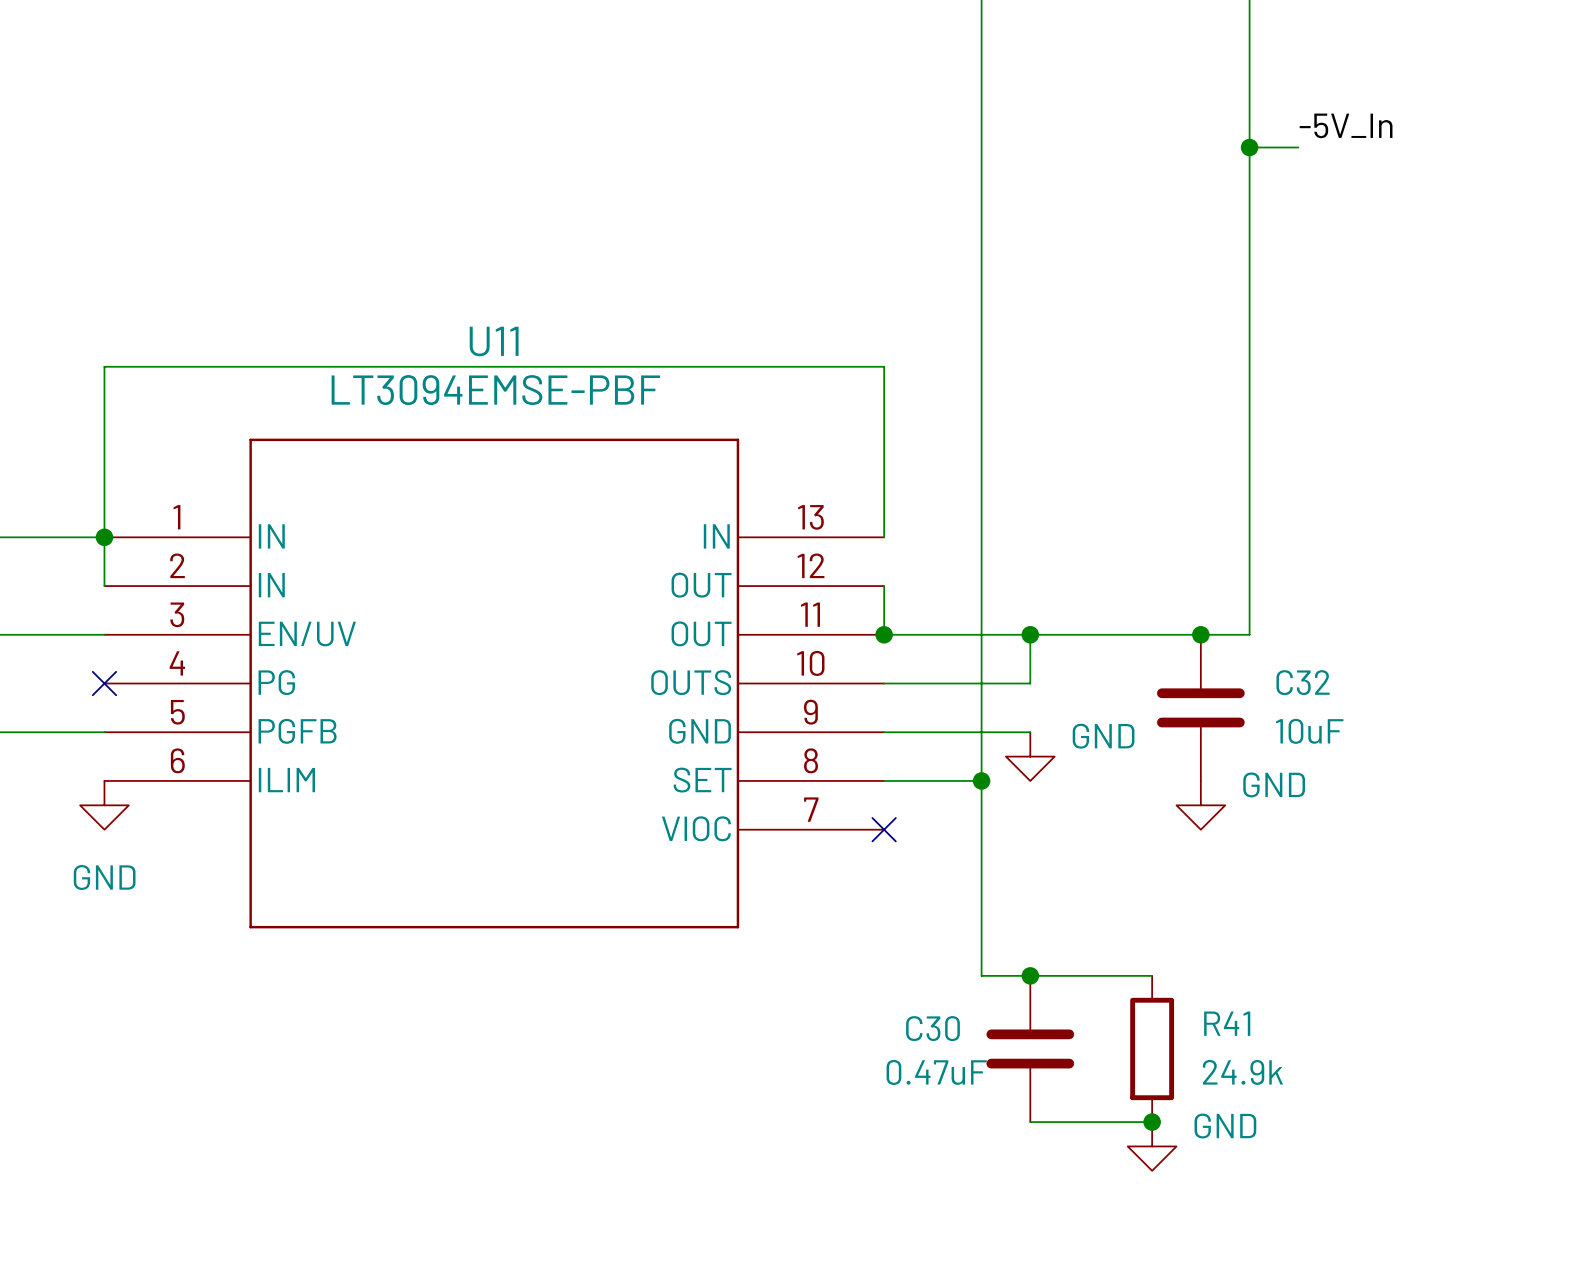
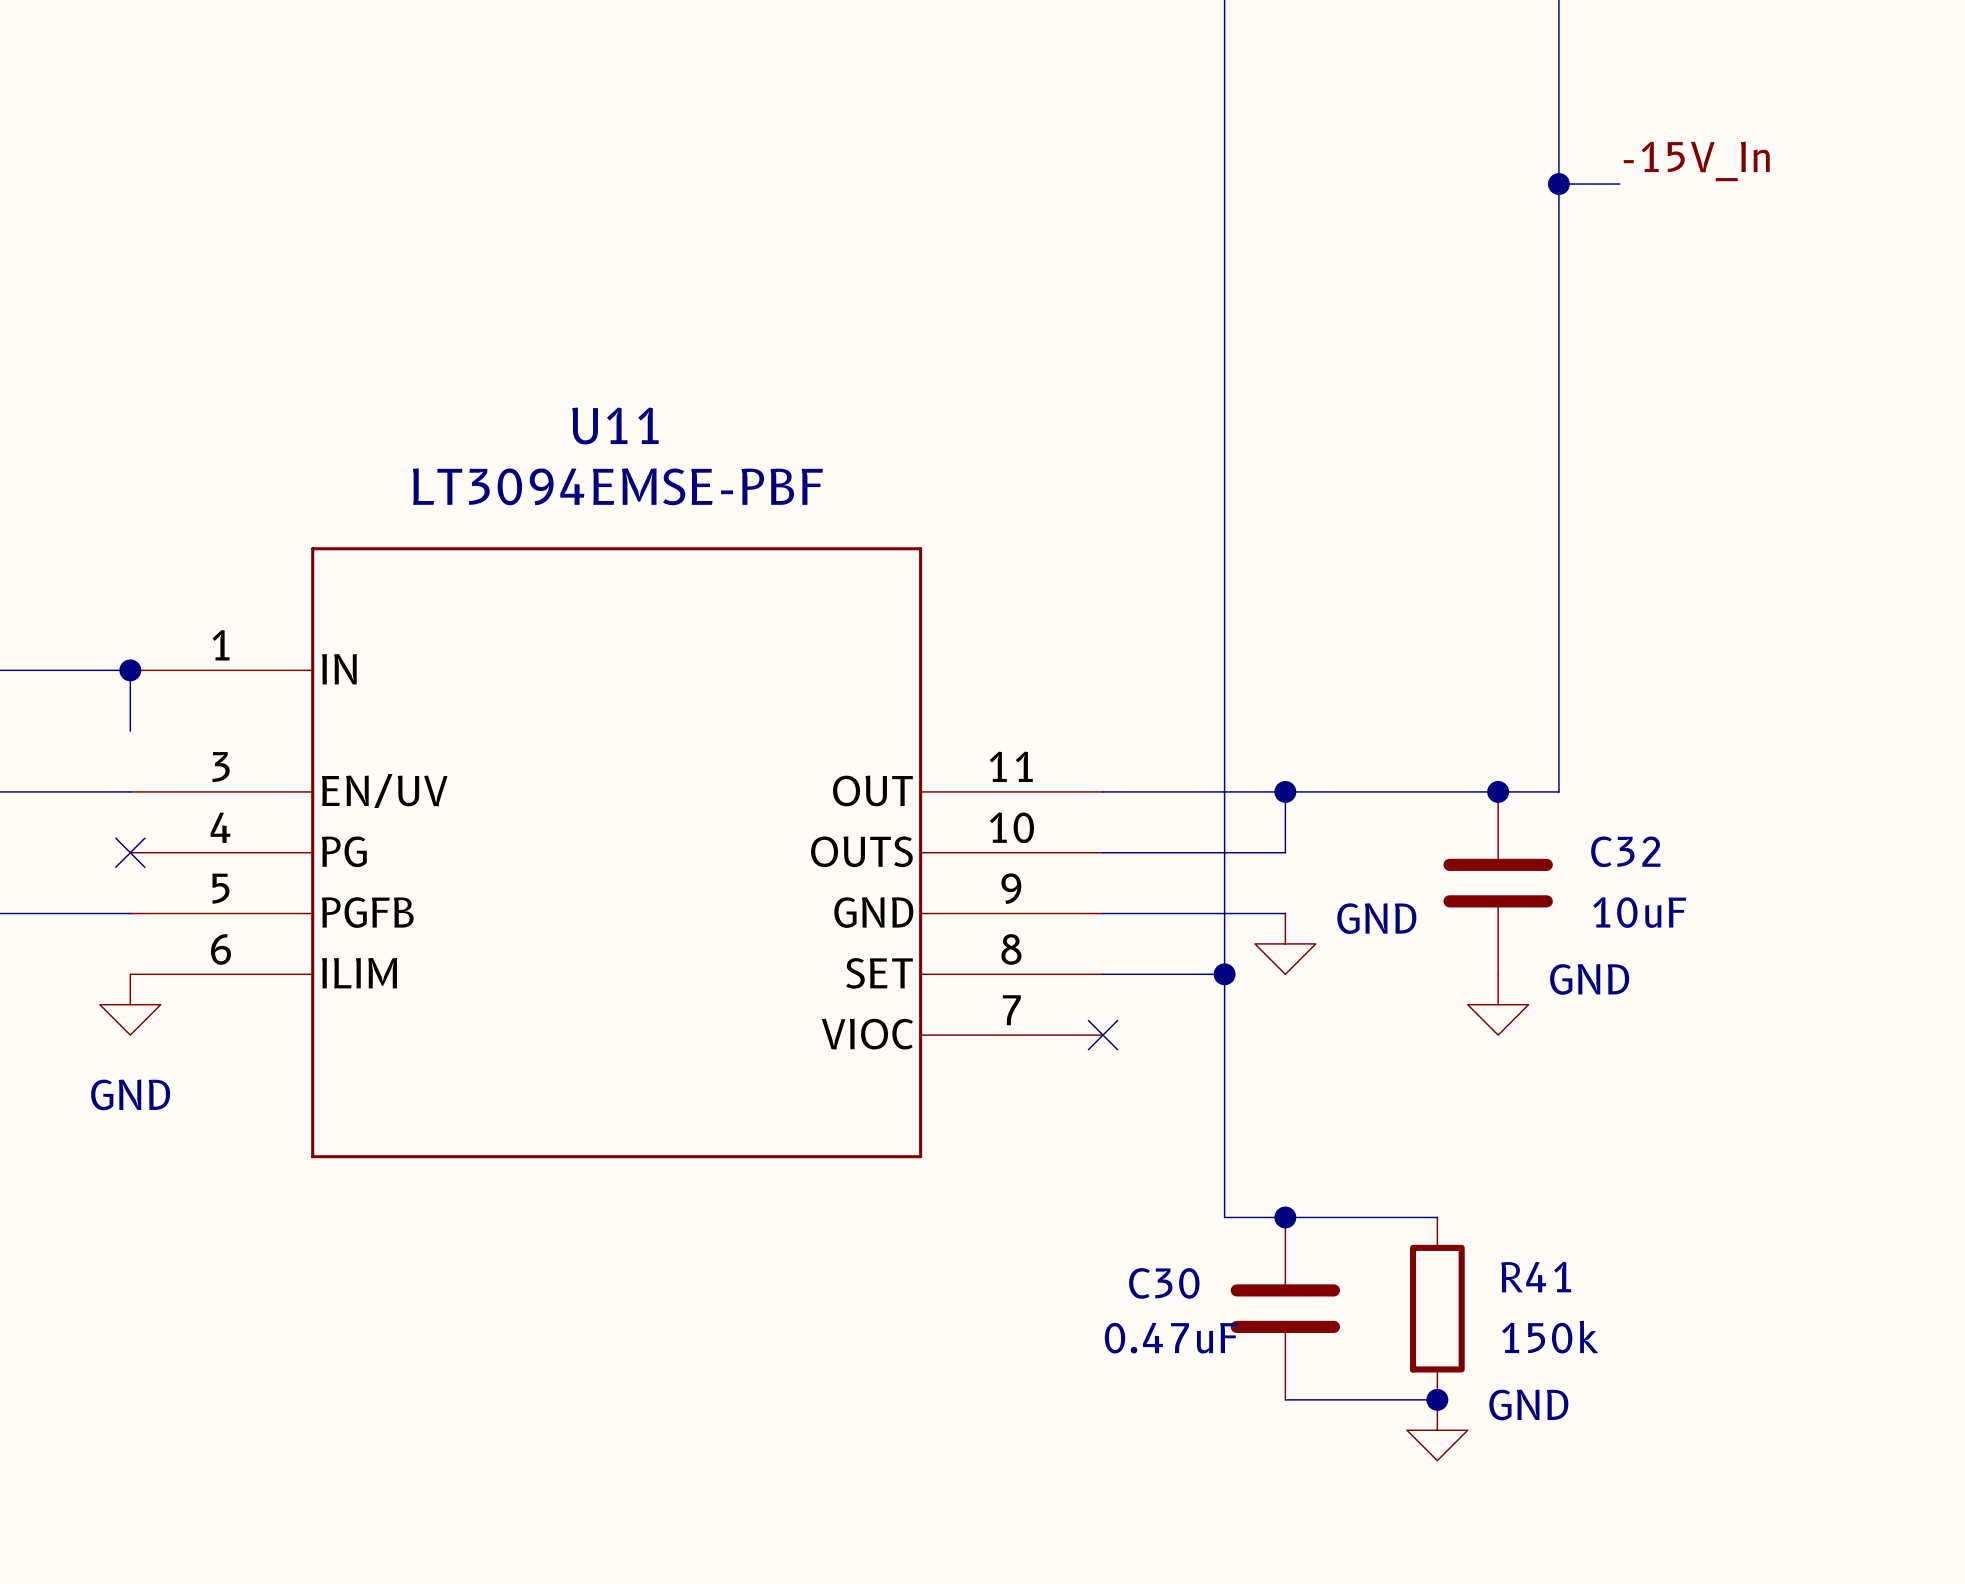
label: -5V_In (1346, 125) -> -15V_In (1696, 161)
U11 symbol: [104, 438, 885, 929] -> [130, 547, 1104, 1159]
wire: (104, 537) (104, 366) (884, 366) (884, 537) -> none
wire: (884, 586) (884, 634) -> none
junction: (884, 634) -> none
R41 value: 24.9k (1242, 1072) -> 150k (1550, 1337)

